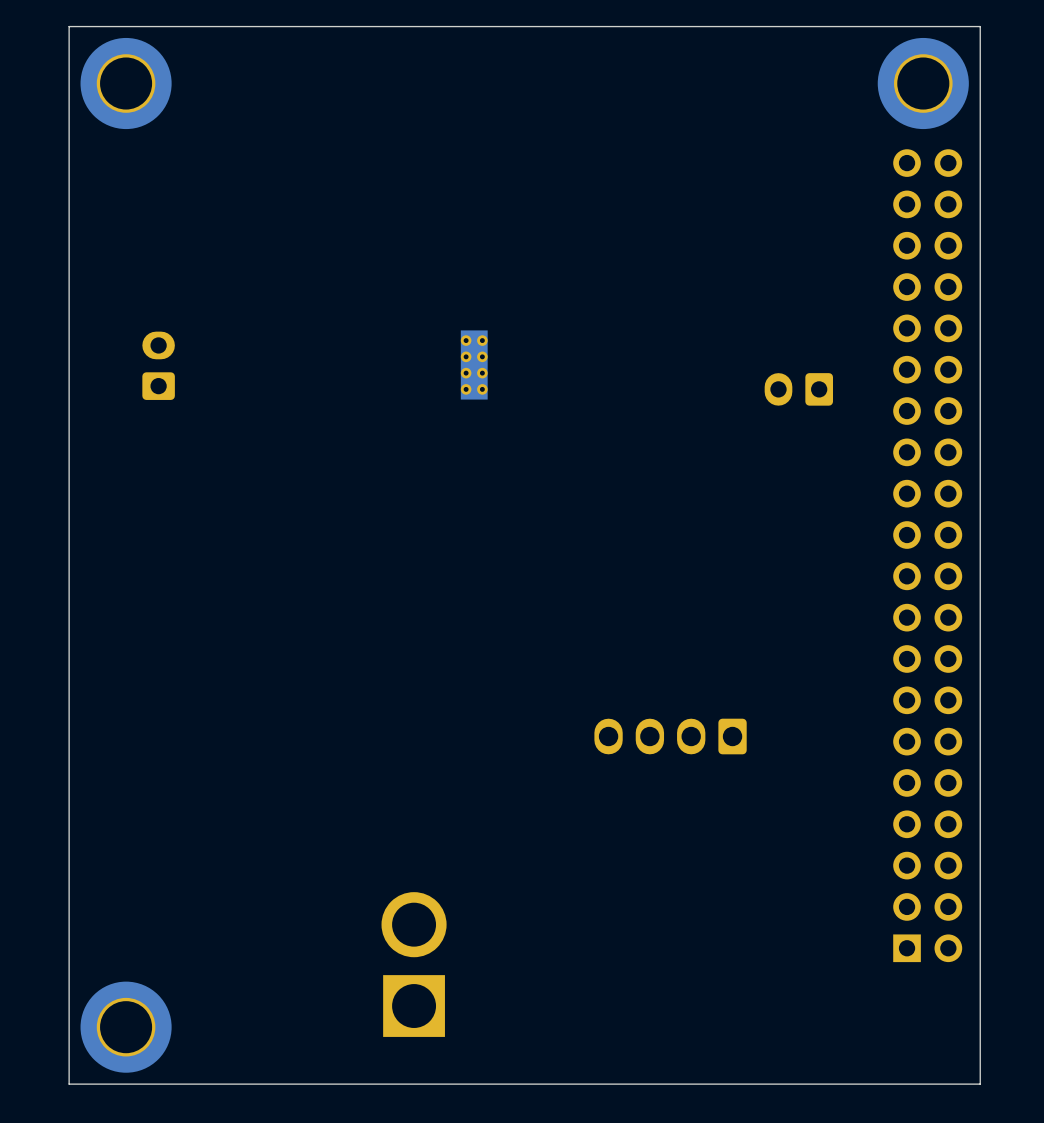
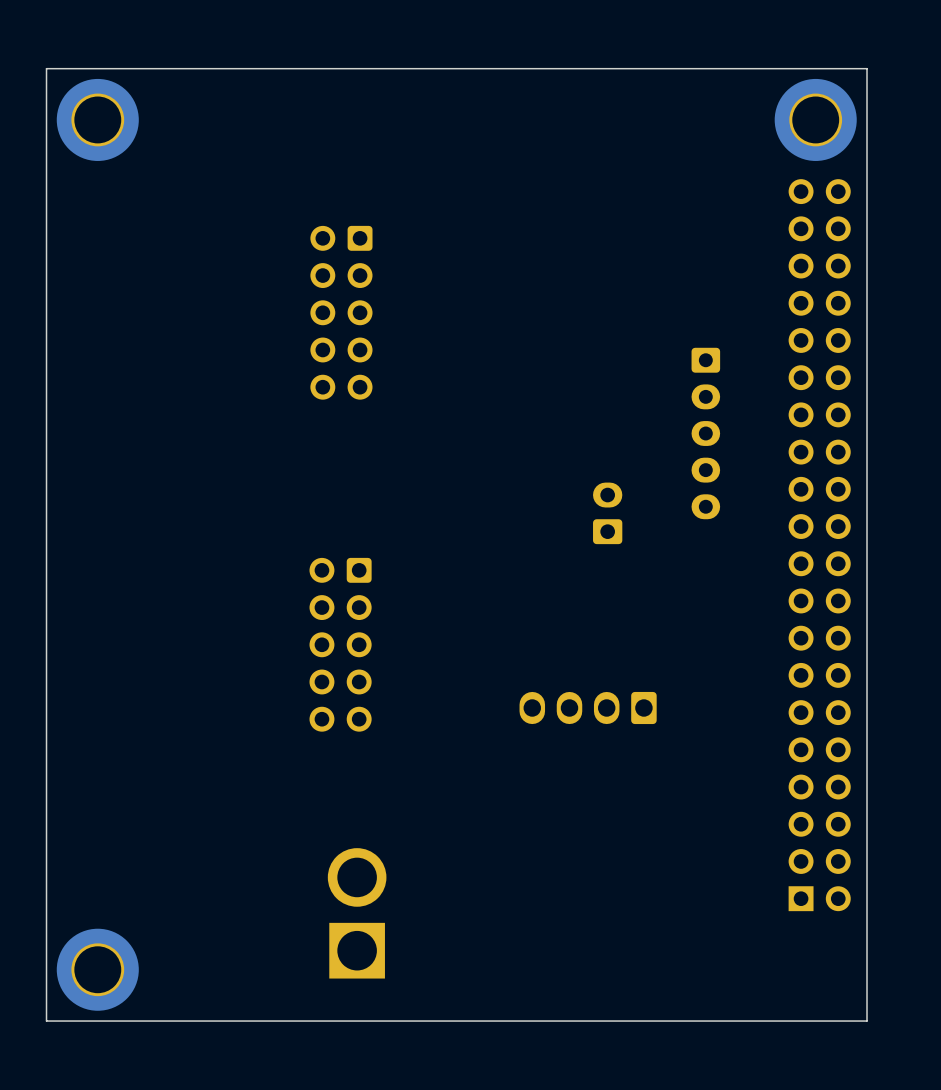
part: none -> (341, 312)
part: (474, 364) -> none
part: (158, 365) -> none
part rotation: 0° (798, 389) -> 90° clockwise (607, 513)
part position: (798, 389) -> (607, 513)
part: none -> (705, 433)
part: none -> (340, 644)

